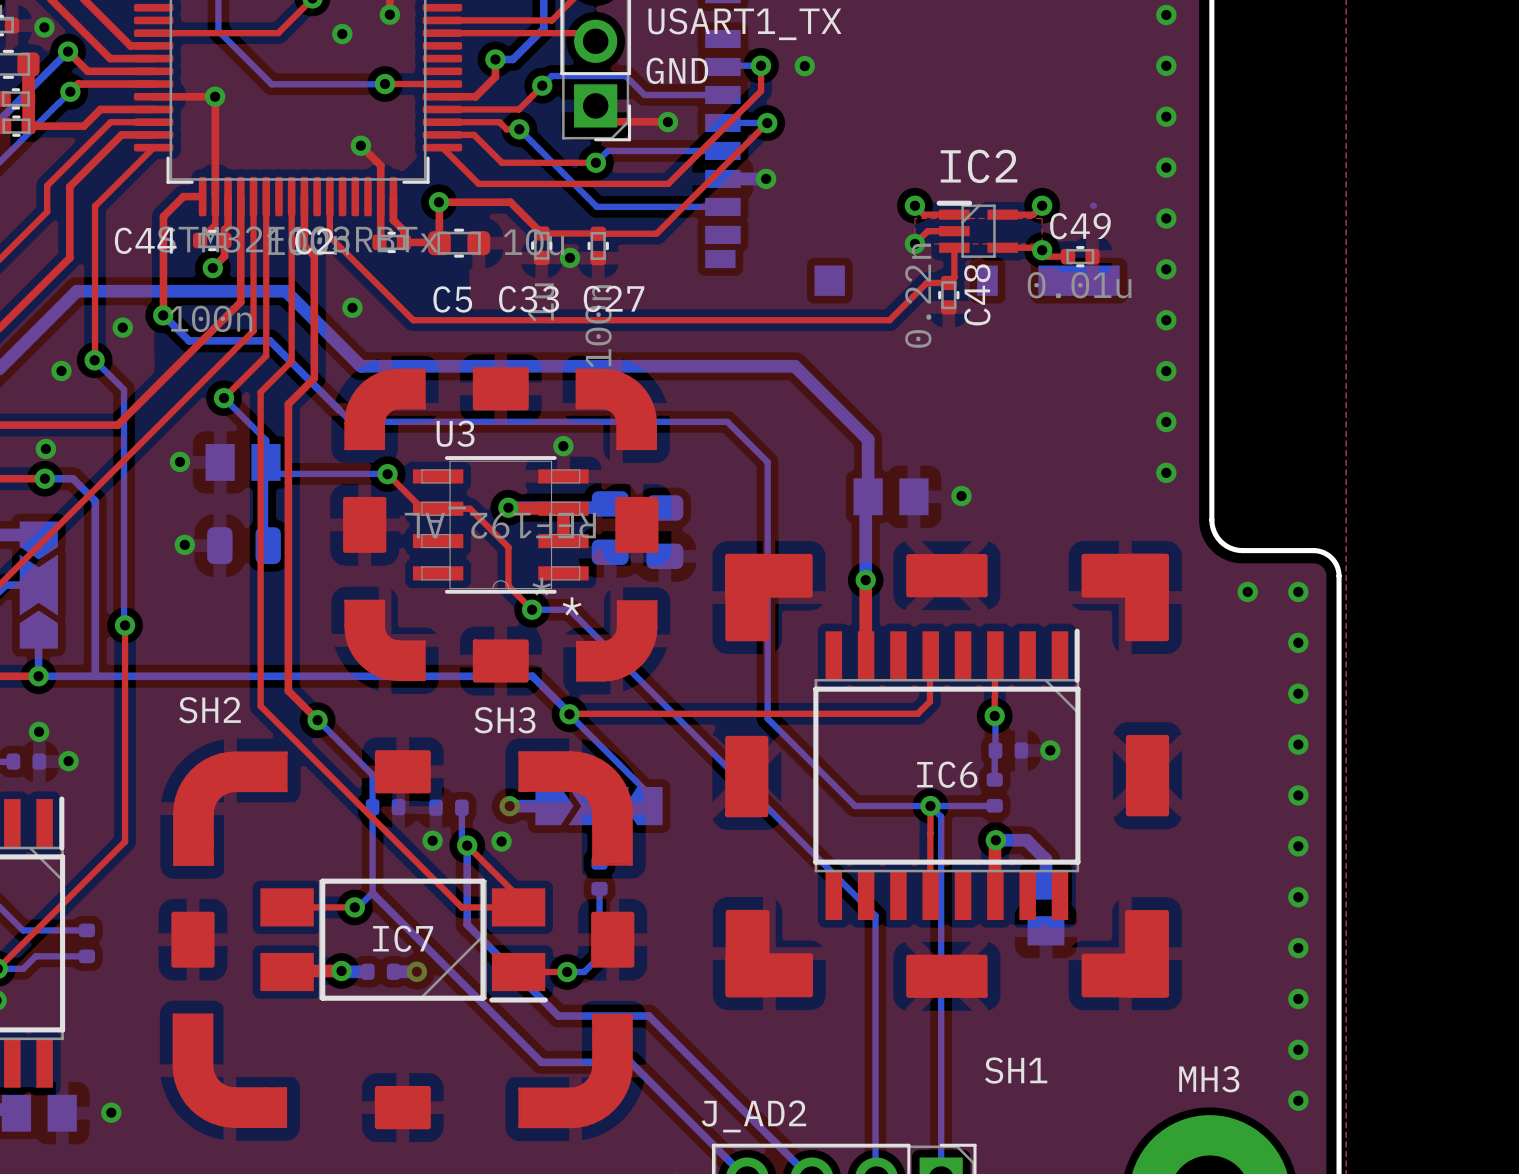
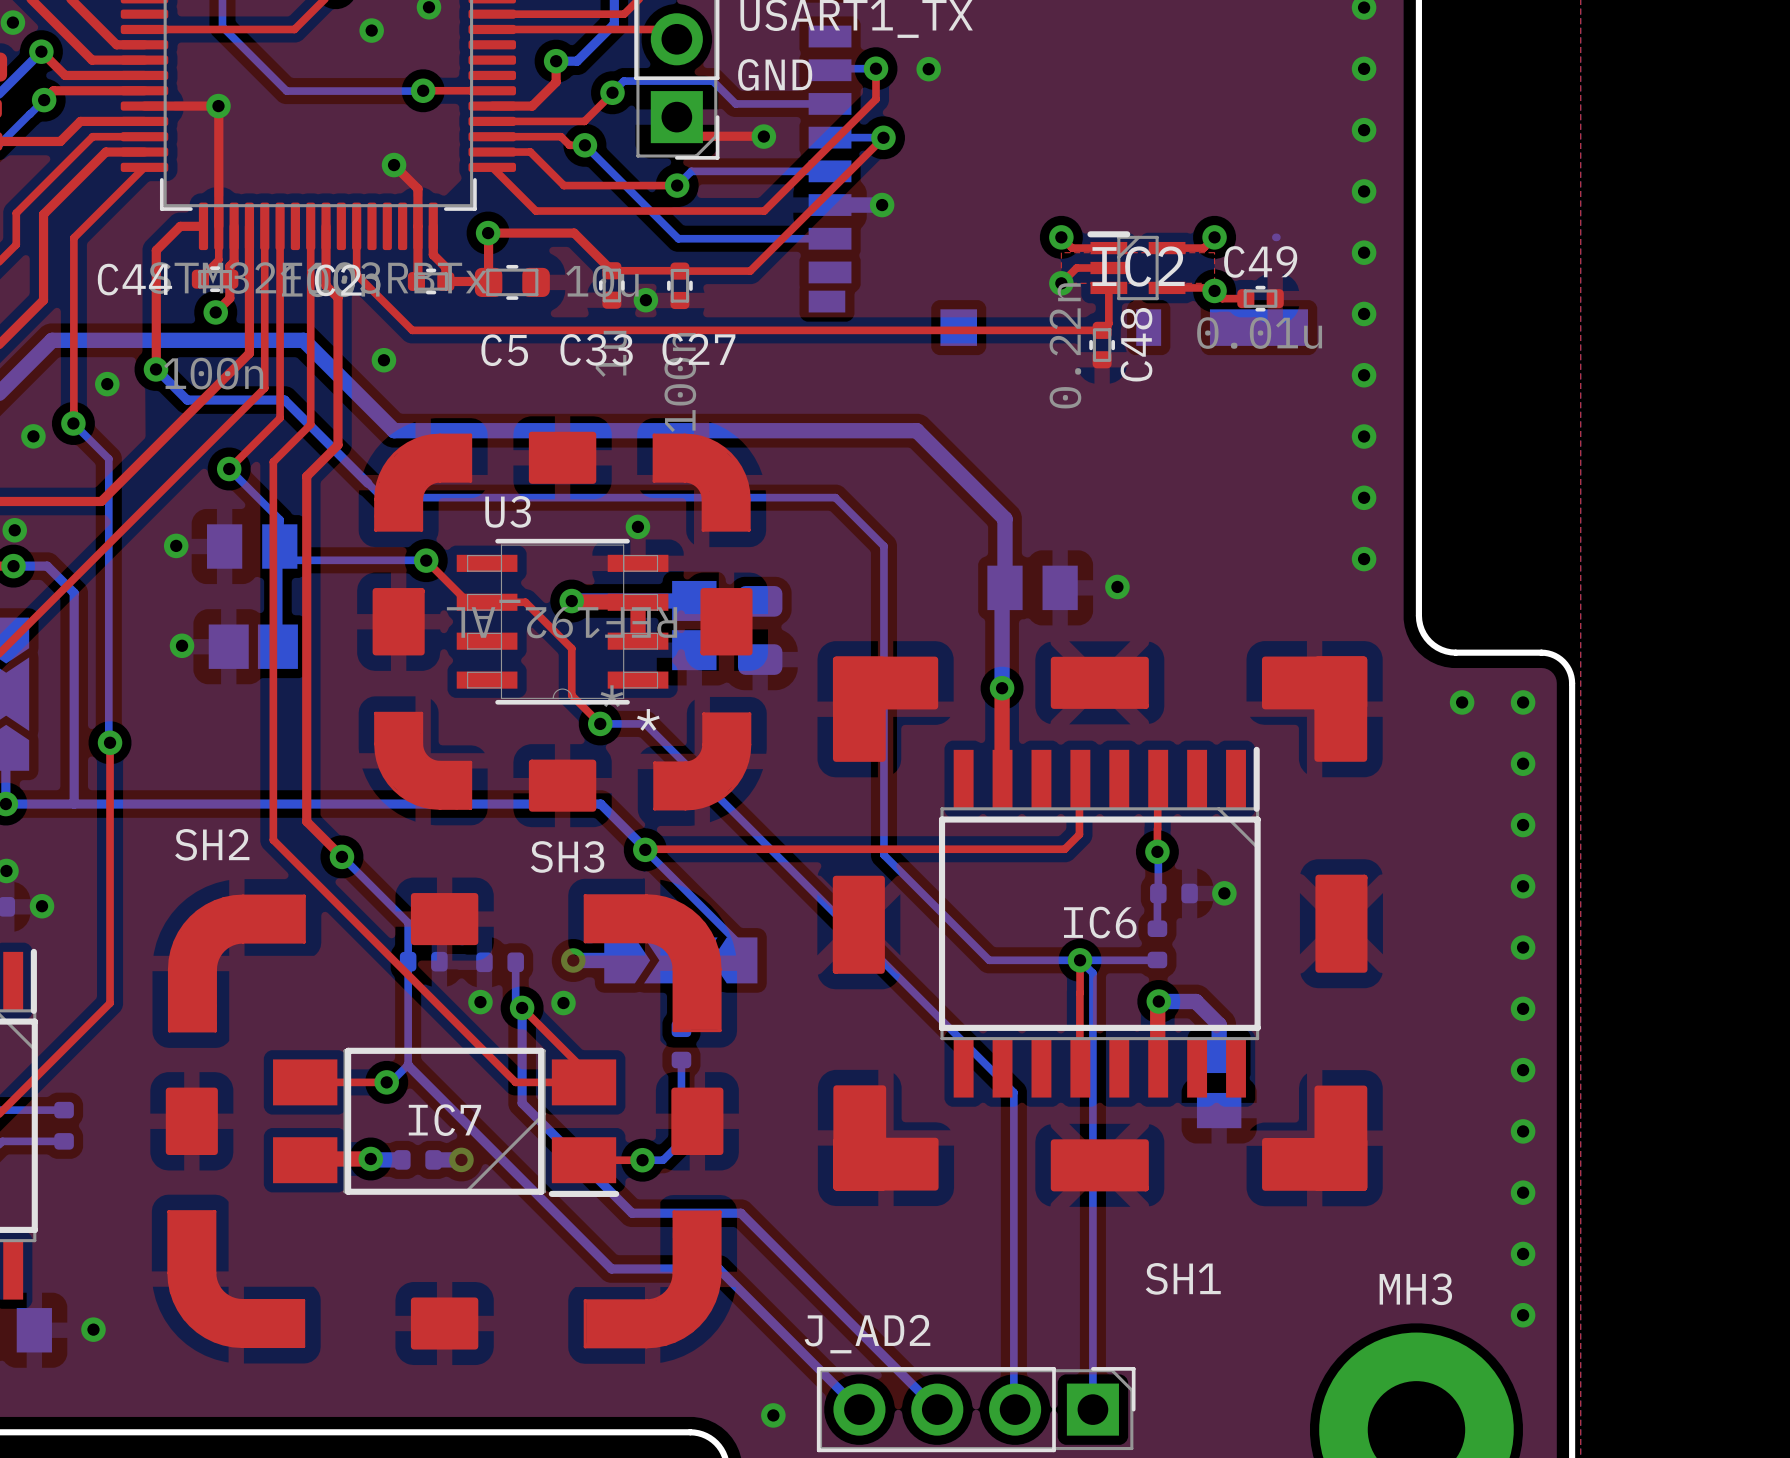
IC2 name position: IC2 (979, 166) -> IC2 (1138, 266)
top track: (376, 282) (413, 320) (889, 320) (926, 282) -> (412, 330) (1075, 330)
part footprint: [591, 491, 629, 565] -> [672, 580, 717, 671]
part footprint: [207, 527, 281, 565] -> [208, 624, 298, 669]

